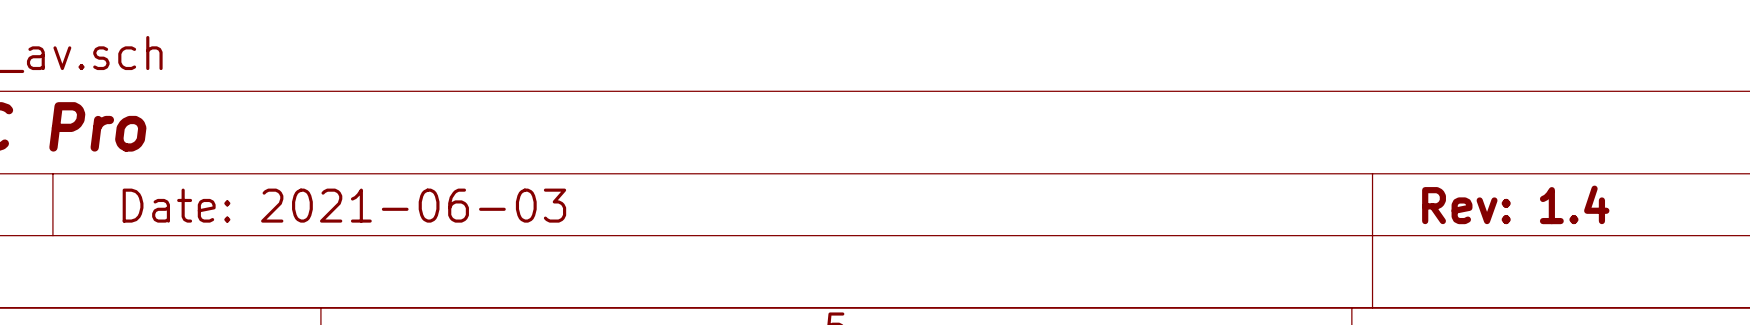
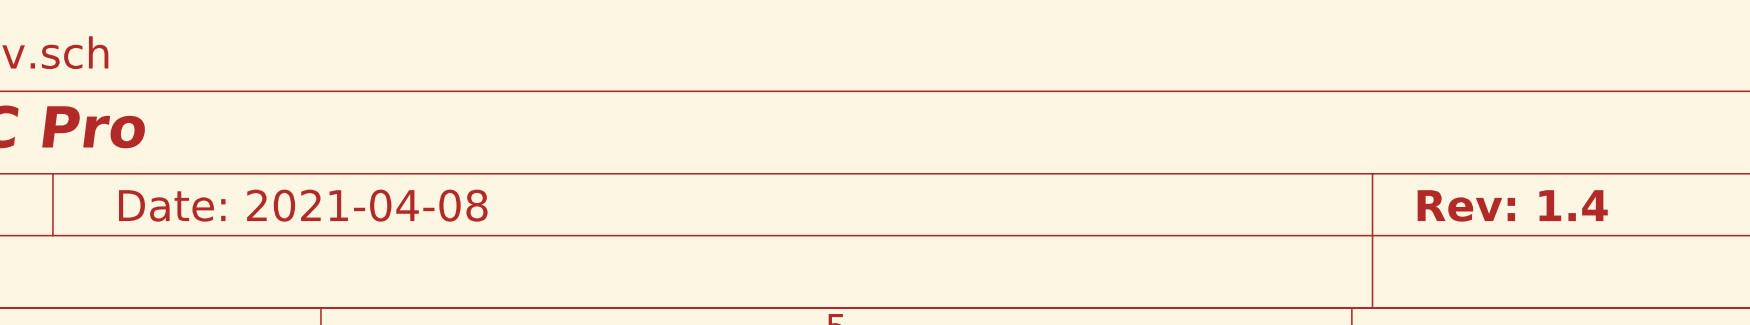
title block: Date: 2021-06-03 (344, 205) -> Date: 2021-04-08 (303, 205)

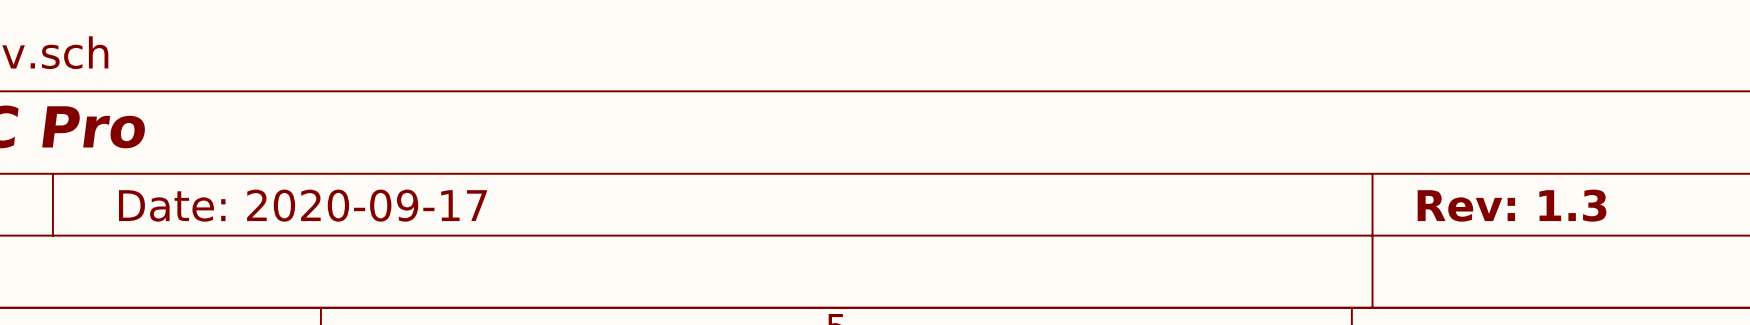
title block: Date: 2021-04-08 (303, 205) -> Date: 2020-09-17 (302, 205)
title block: Rev: 1.4 (1512, 205) -> Rev: 1.3 (1512, 205)

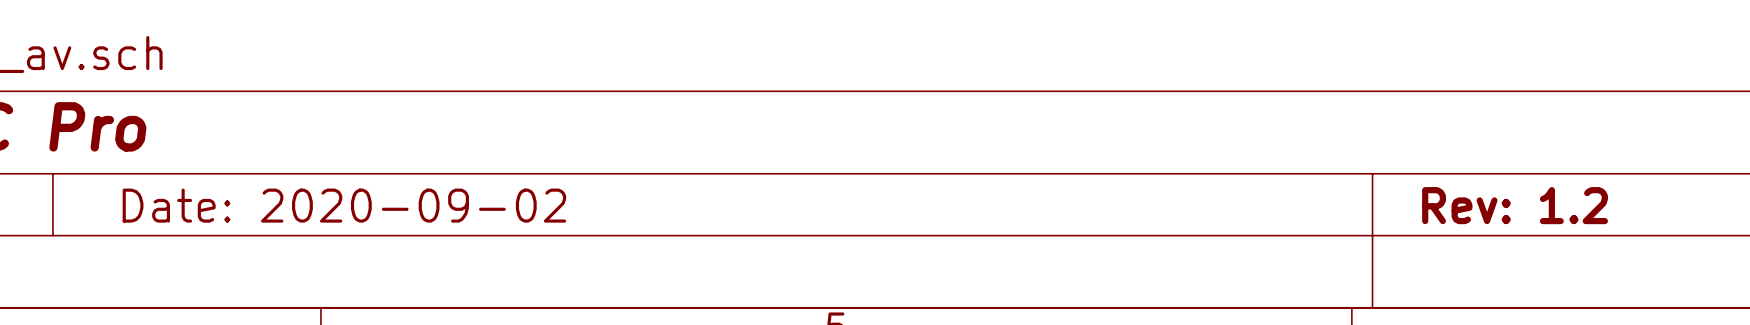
title block: Date: 2020-09-17 (302, 205) -> Date: 2020-09-02 (344, 205)
title block: Rev: 1.3 (1512, 205) -> Rev: 1.2 (1515, 205)

